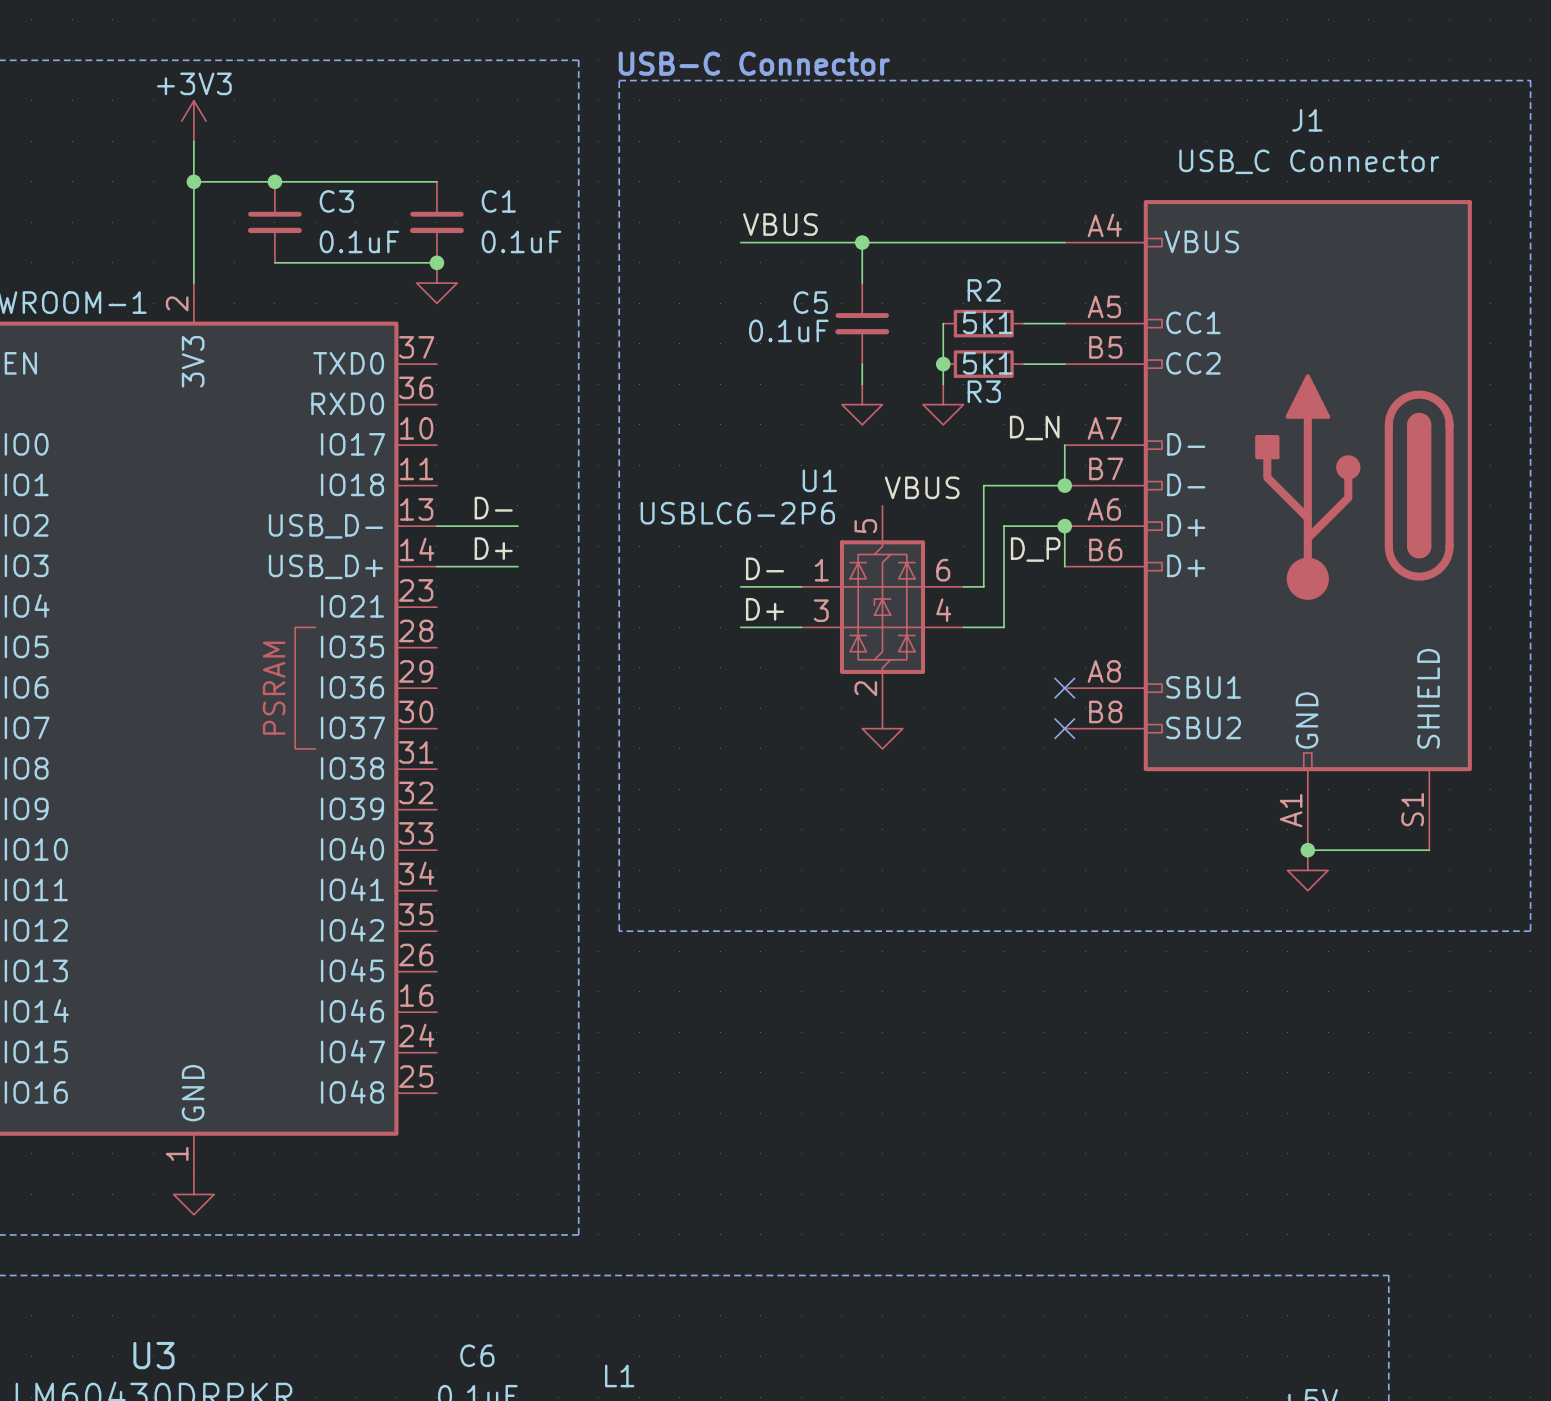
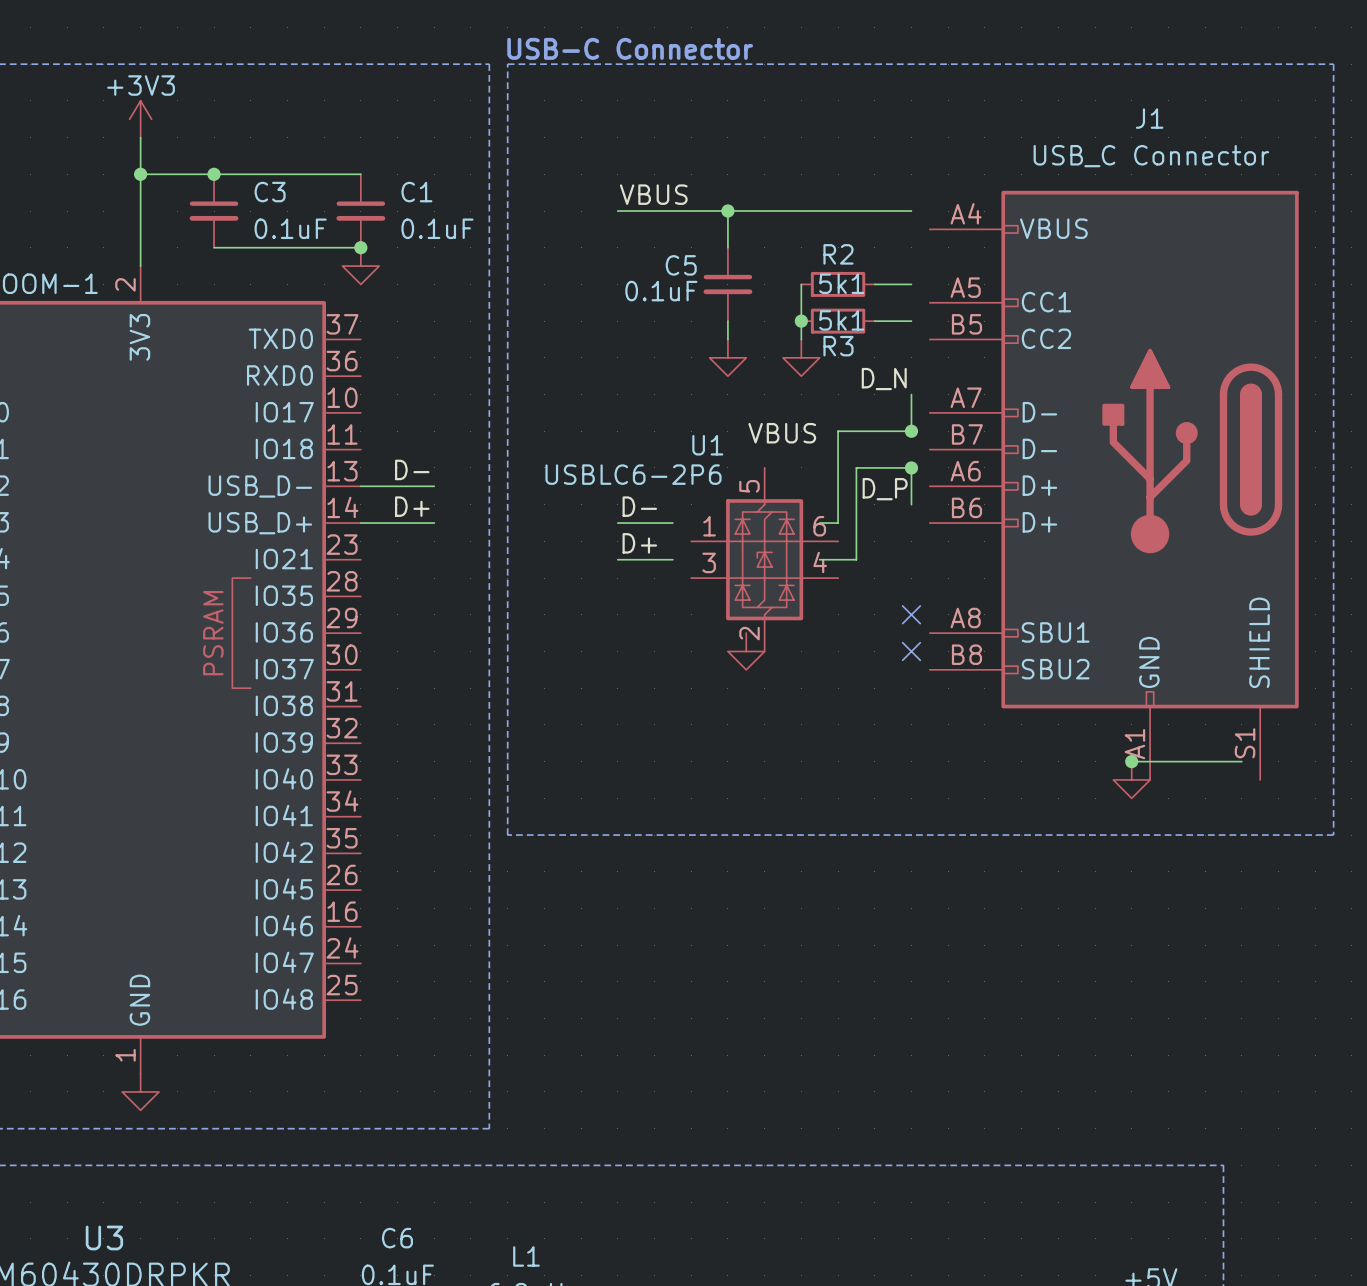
text position: USB-C Connector (754, 63) -> USB-C Connector (630, 48)
line: (619, 80) (1530, 80) (1530, 931) (619, 931) (619, 80) -> (507, 64) (1333, 64) (1333, 835) (507, 835) (507, 64)
label position: VBUS (780, 224) -> VBUS (653, 194)
wire: (740, 242) (1064, 242) -> (617, 211) (911, 211)
wire: (862, 242) (862, 283) -> (727, 211) (727, 247)
junction position: (862, 242) -> (727, 211)
C5 position: (862, 323) -> (727, 284)
wire: (943, 323) (943, 384) -> (801, 284) (801, 339)
R2 position: (983, 323) -> (838, 284)
wire: (1024, 323) (1064, 323) -> (874, 284) (911, 284)
wire: (862, 364) (862, 384) -> (727, 321) (727, 339)
junction position: (943, 364) -> (801, 321)
R3 position: (983, 364) -> (838, 321)
wire: (1024, 364) (1064, 364) -> (874, 321) (911, 321)
power symbol position: (862, 404) -> (727, 357)
power symbol position: (943, 404) -> (801, 357)
wire: none -> (911, 394) (911, 431) (838, 431) (838, 523) (819, 523)
label position: D_N (1034, 428) -> D_N (884, 379)
wire: (1064, 445) (1064, 485) (983, 485) (983, 505) -> (911, 504) (911, 467) (856, 467)
junction: none -> (911, 431)
junction: (1064, 485) -> none
label position: VBUS (922, 487) -> VBUS (782, 433)
junction: none -> (911, 467)
junction: (1064, 526) -> none
label position: D_P (1035, 549) -> D_P (885, 489)
wire: (1064, 566) (1064, 526) (1004, 526) (1004, 627) (963, 627) -> none
label position: D- (764, 568) -> D- (639, 506)
wire: (740, 586) (801, 586) -> (617, 523) (672, 523)
wire: (963, 586) (983, 586) -> (819, 559) (856, 559) (856, 541)
label position: D+ (764, 609) -> D+ (639, 543)
wire: (740, 627) (801, 627) -> (617, 559) (672, 559)
no-connect mark: none -> (911, 614)
no-connect mark: (1064, 688) -> none
no-connect mark: none -> (911, 651)
power symbol position: (882, 728) -> (746, 651)
no-connect mark: (1064, 728) -> none
wire: (1307, 850) (1429, 850) -> (1131, 761) (1241, 761)
junction position: (1307, 850) -> (1131, 761)
power symbol position: (1307, 870) -> (1131, 779)

